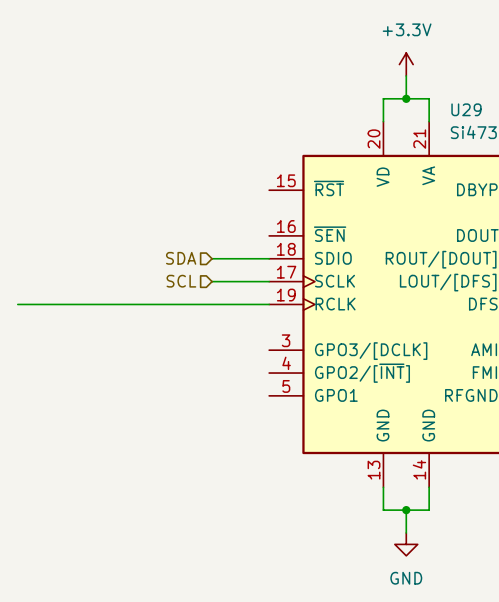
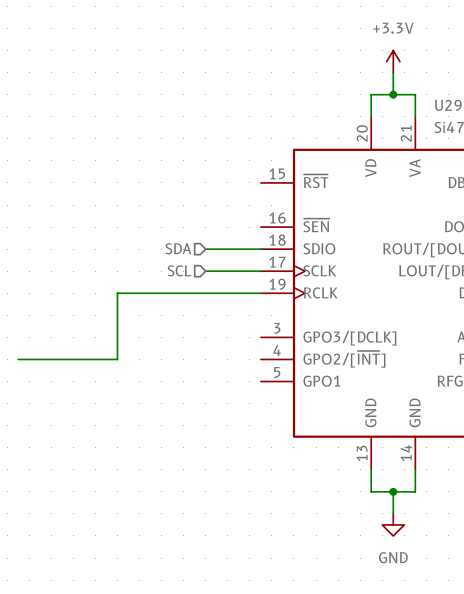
wire: (17, 304) (120, 304) -> (18, 359) (117, 359) (117, 293)

